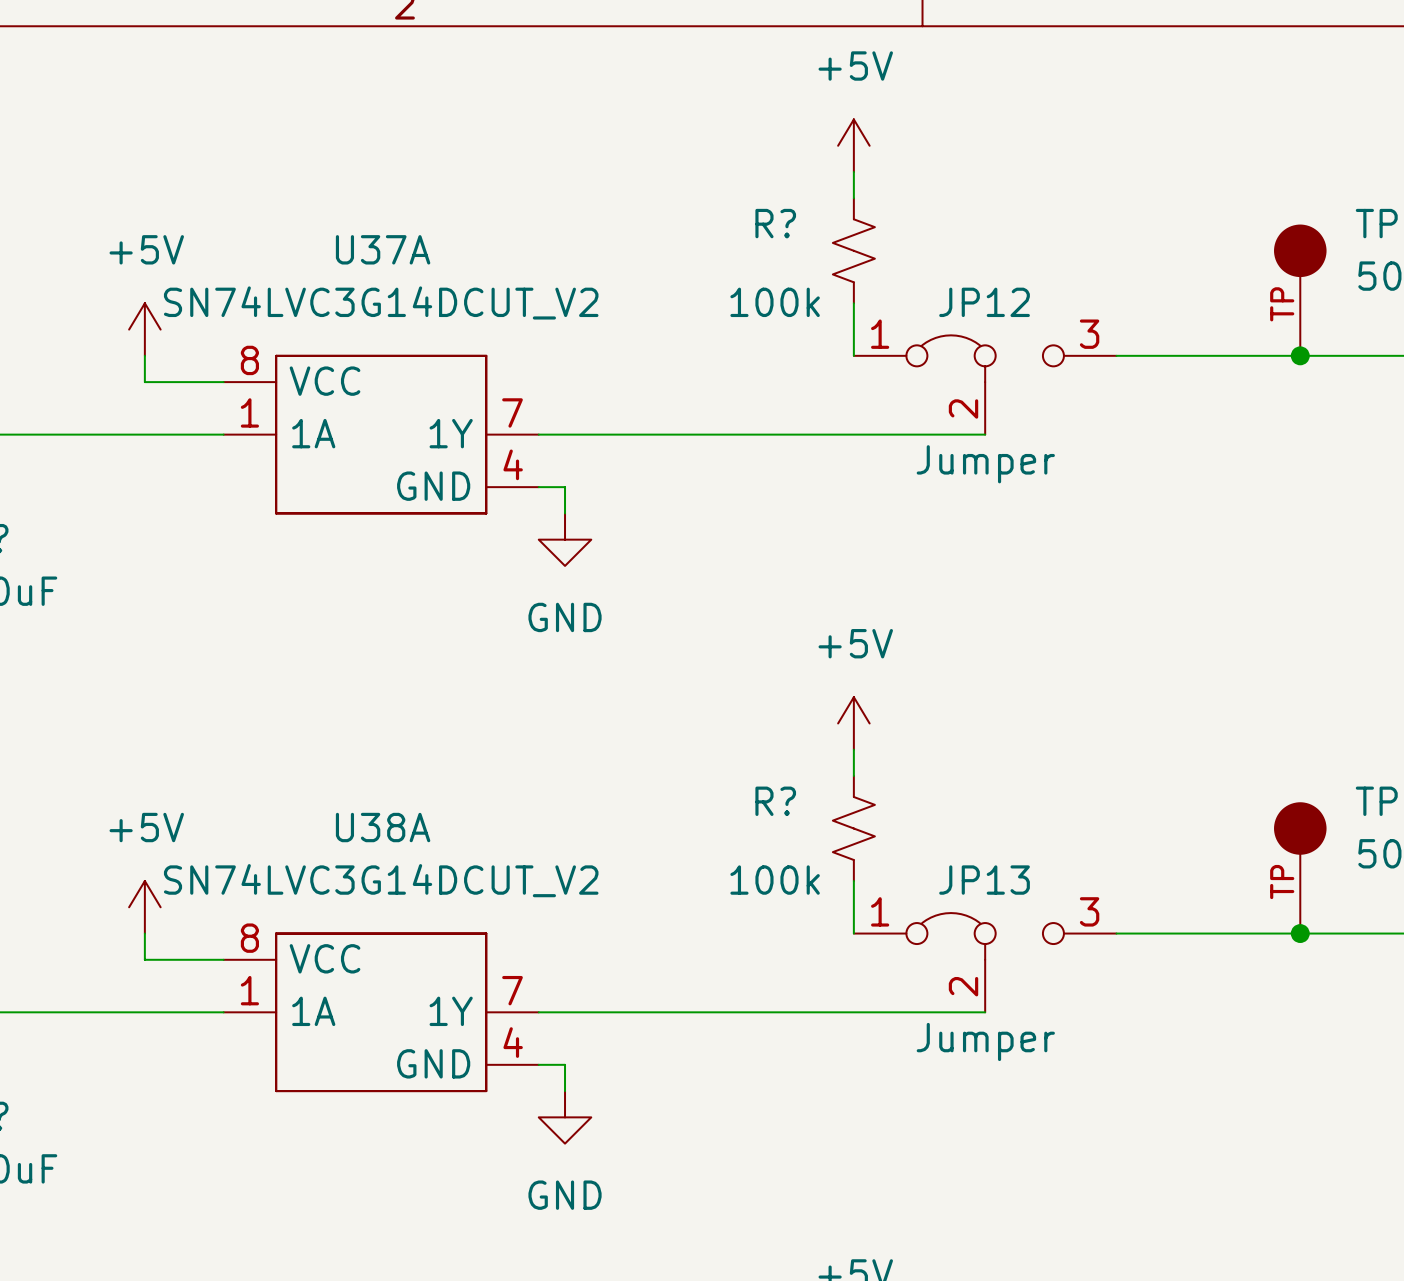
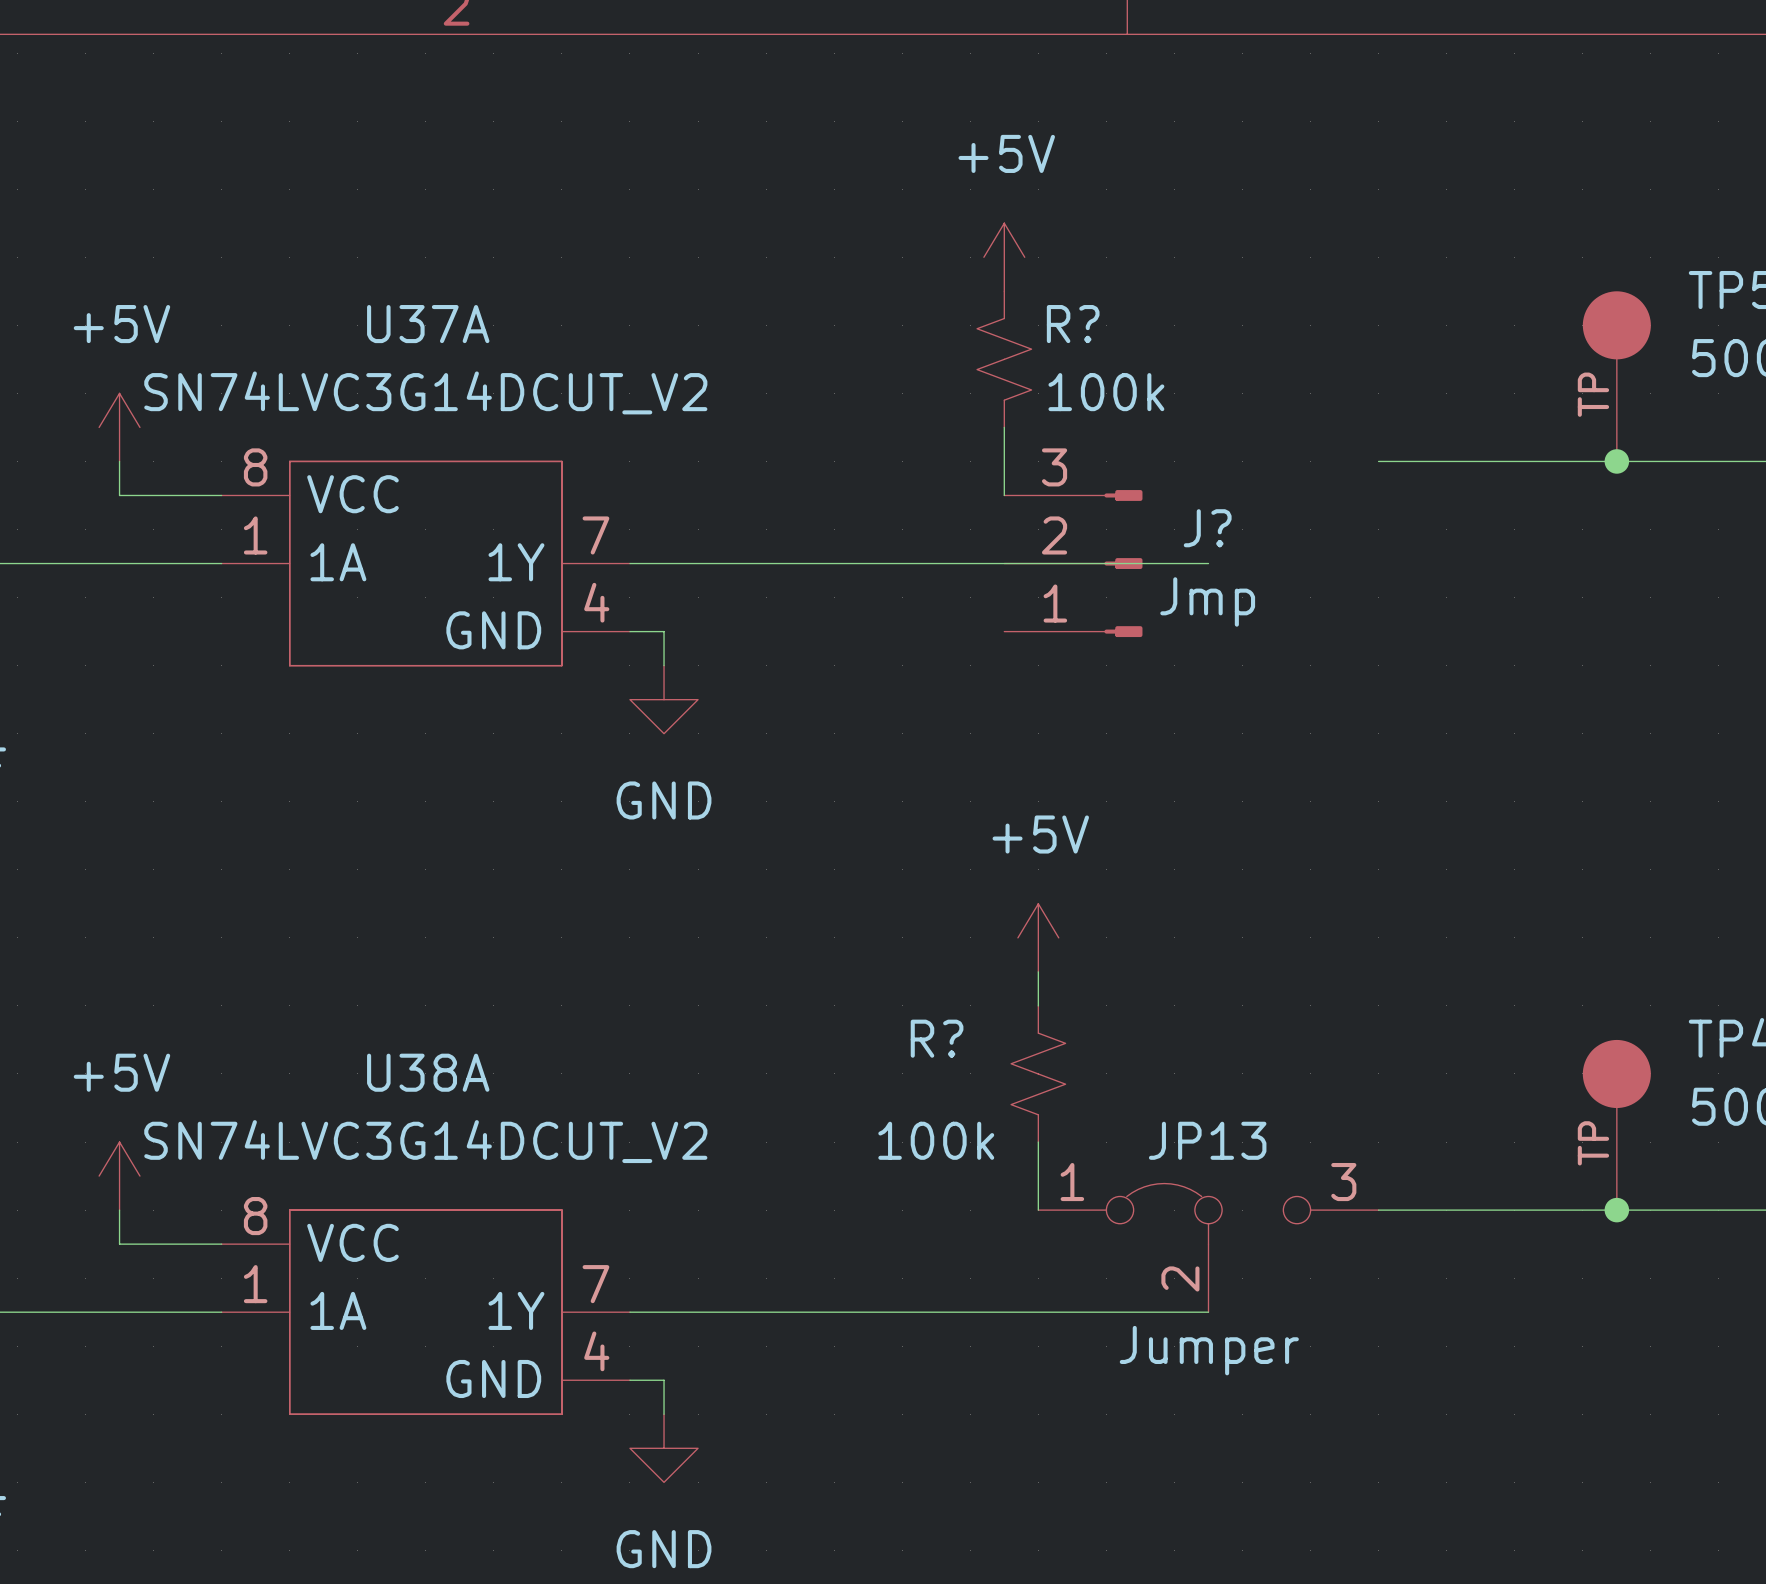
power symbol position: +5V (853, 145) -> +5V (1004, 257)
wire: (853, 172) (853, 198) -> none
R?: 100k (853, 250) -> none
R?: none -> 100k (1004, 359)
wire: (853, 303) (853, 355) -> (1004, 427) (1004, 495)
JP12: Jumper (985, 384) -> none
J?: none -> Jmp (1073, 563)

